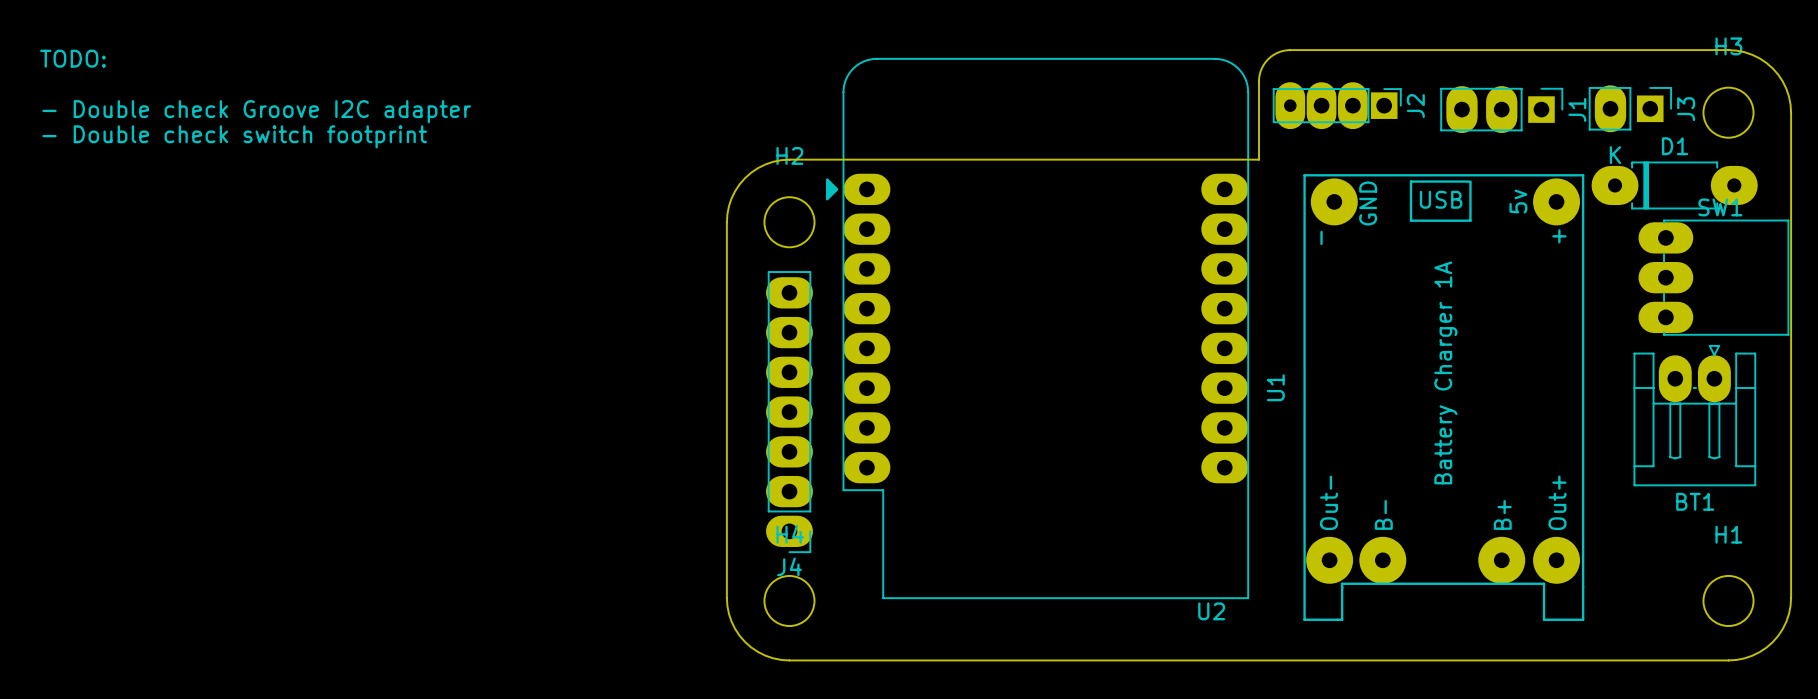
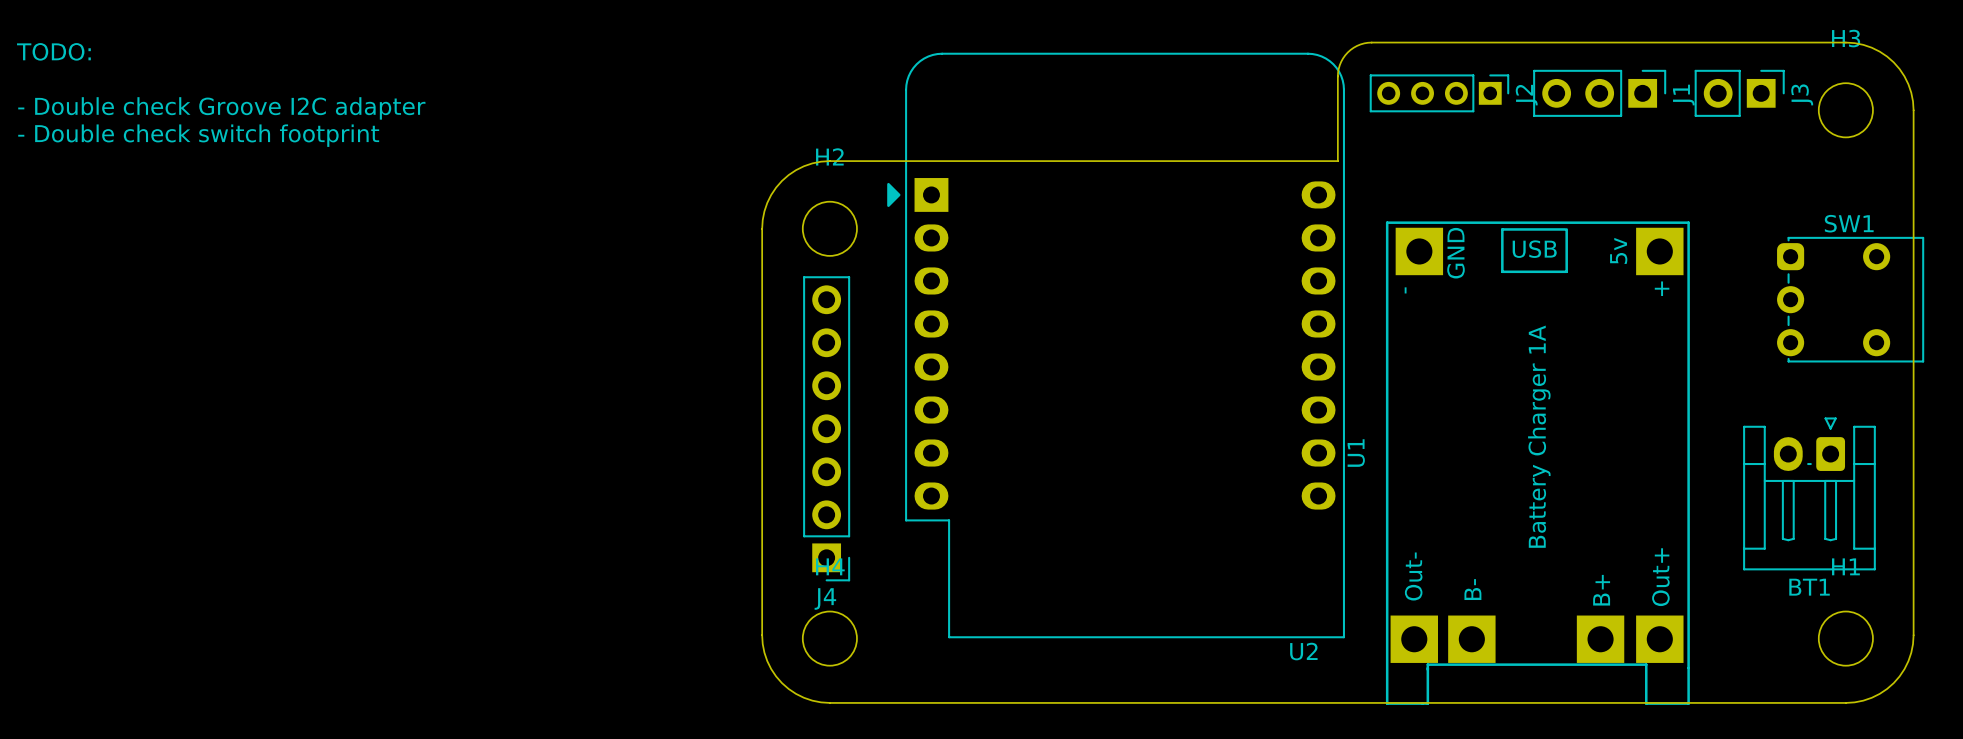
U2 footprint: [826, 57, 1250, 600] -> [887, 52, 1345, 639]
J2 footprint: [1272, 82, 1402, 130] -> [1369, 74, 1510, 113]
J3 footprint: [1588, 85, 1673, 133] -> [1694, 69, 1785, 117]
J1 footprint: [1440, 86, 1564, 134] -> [1533, 69, 1667, 117]
U1 footprint: [1303, 174, 1585, 621] -> [1385, 221, 1690, 705]
D1: (1674, 185) -> none
SW1 footprint: [1638, 219, 1790, 336] -> [1777, 236, 1925, 363]
J4 footprint: [766, 271, 813, 554] -> [803, 276, 851, 582]
BT1 footprint: [1633, 344, 1757, 487] -> [1743, 417, 1876, 571]

